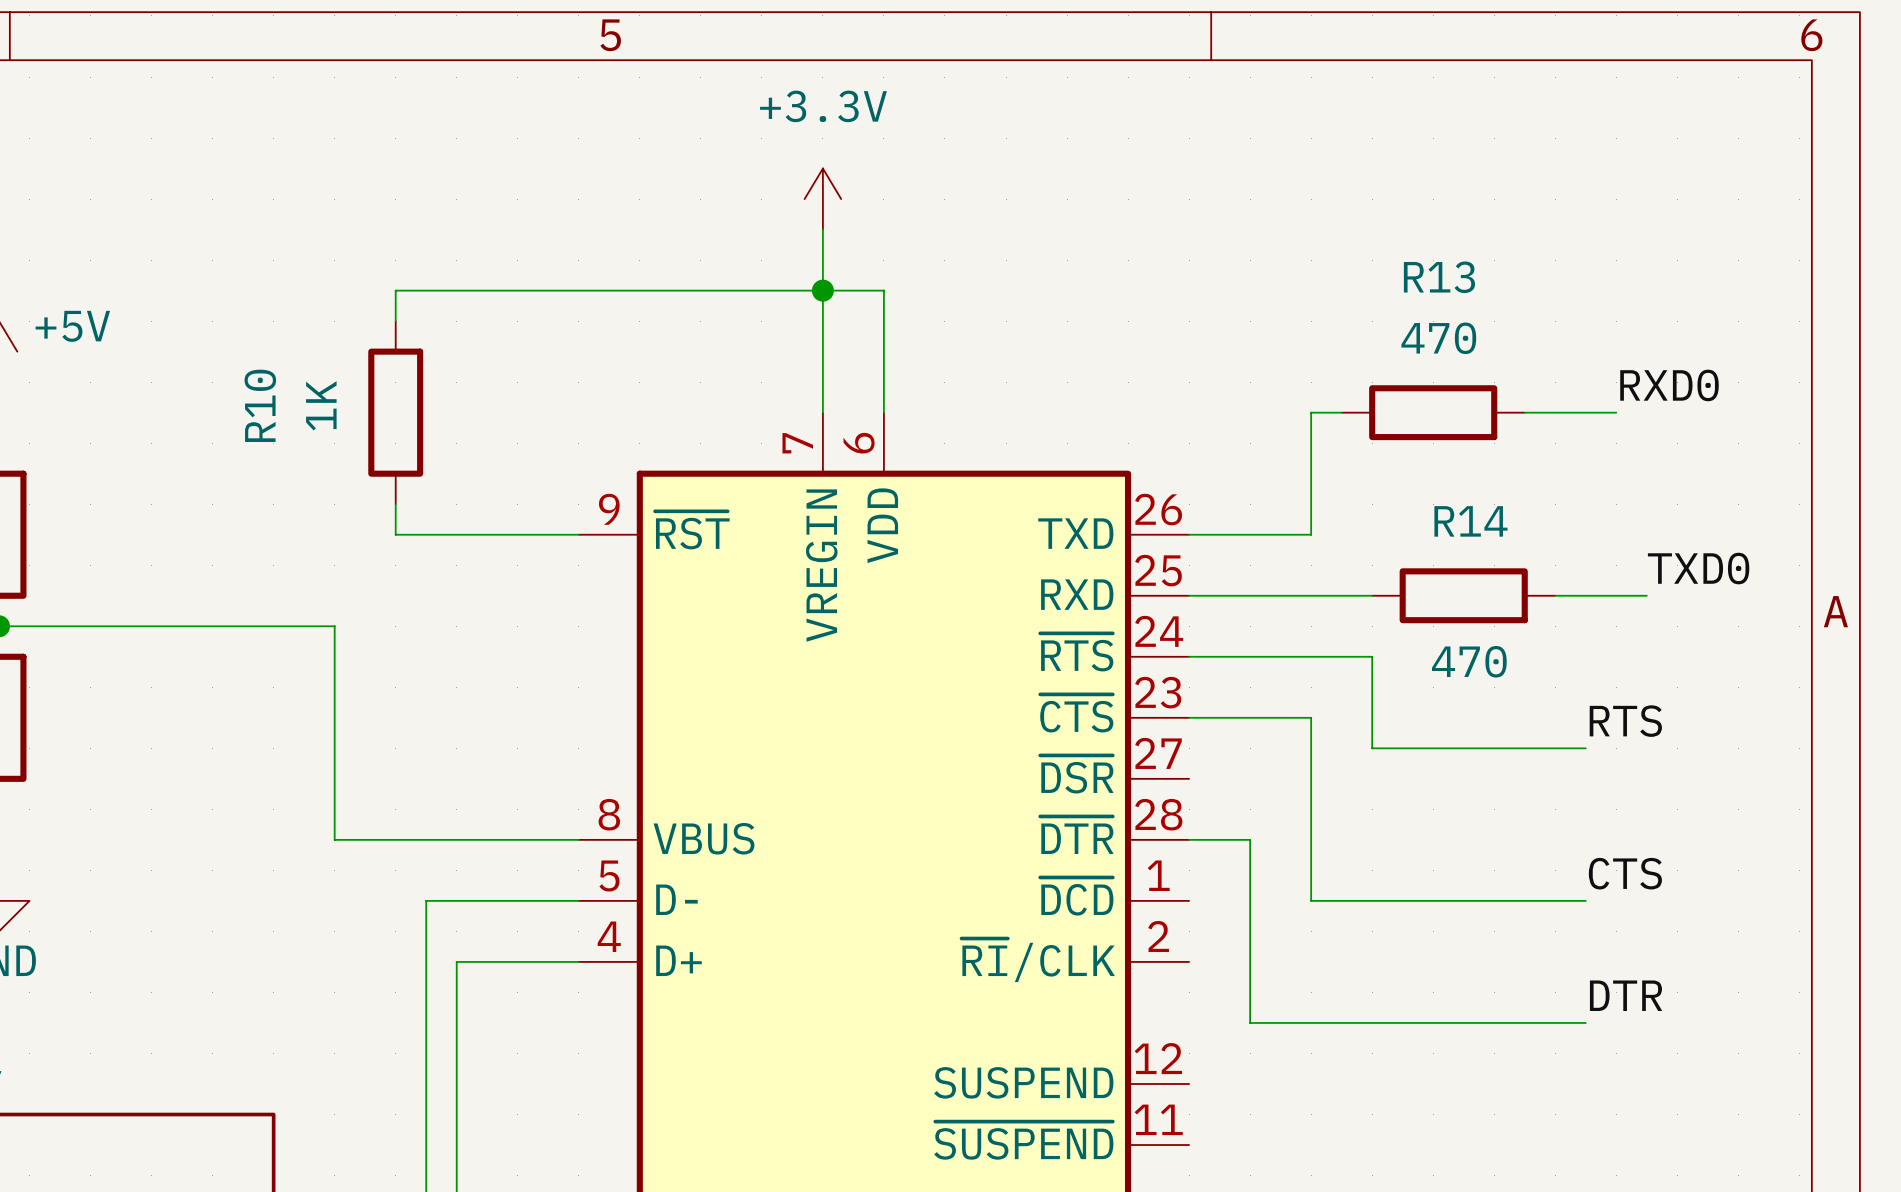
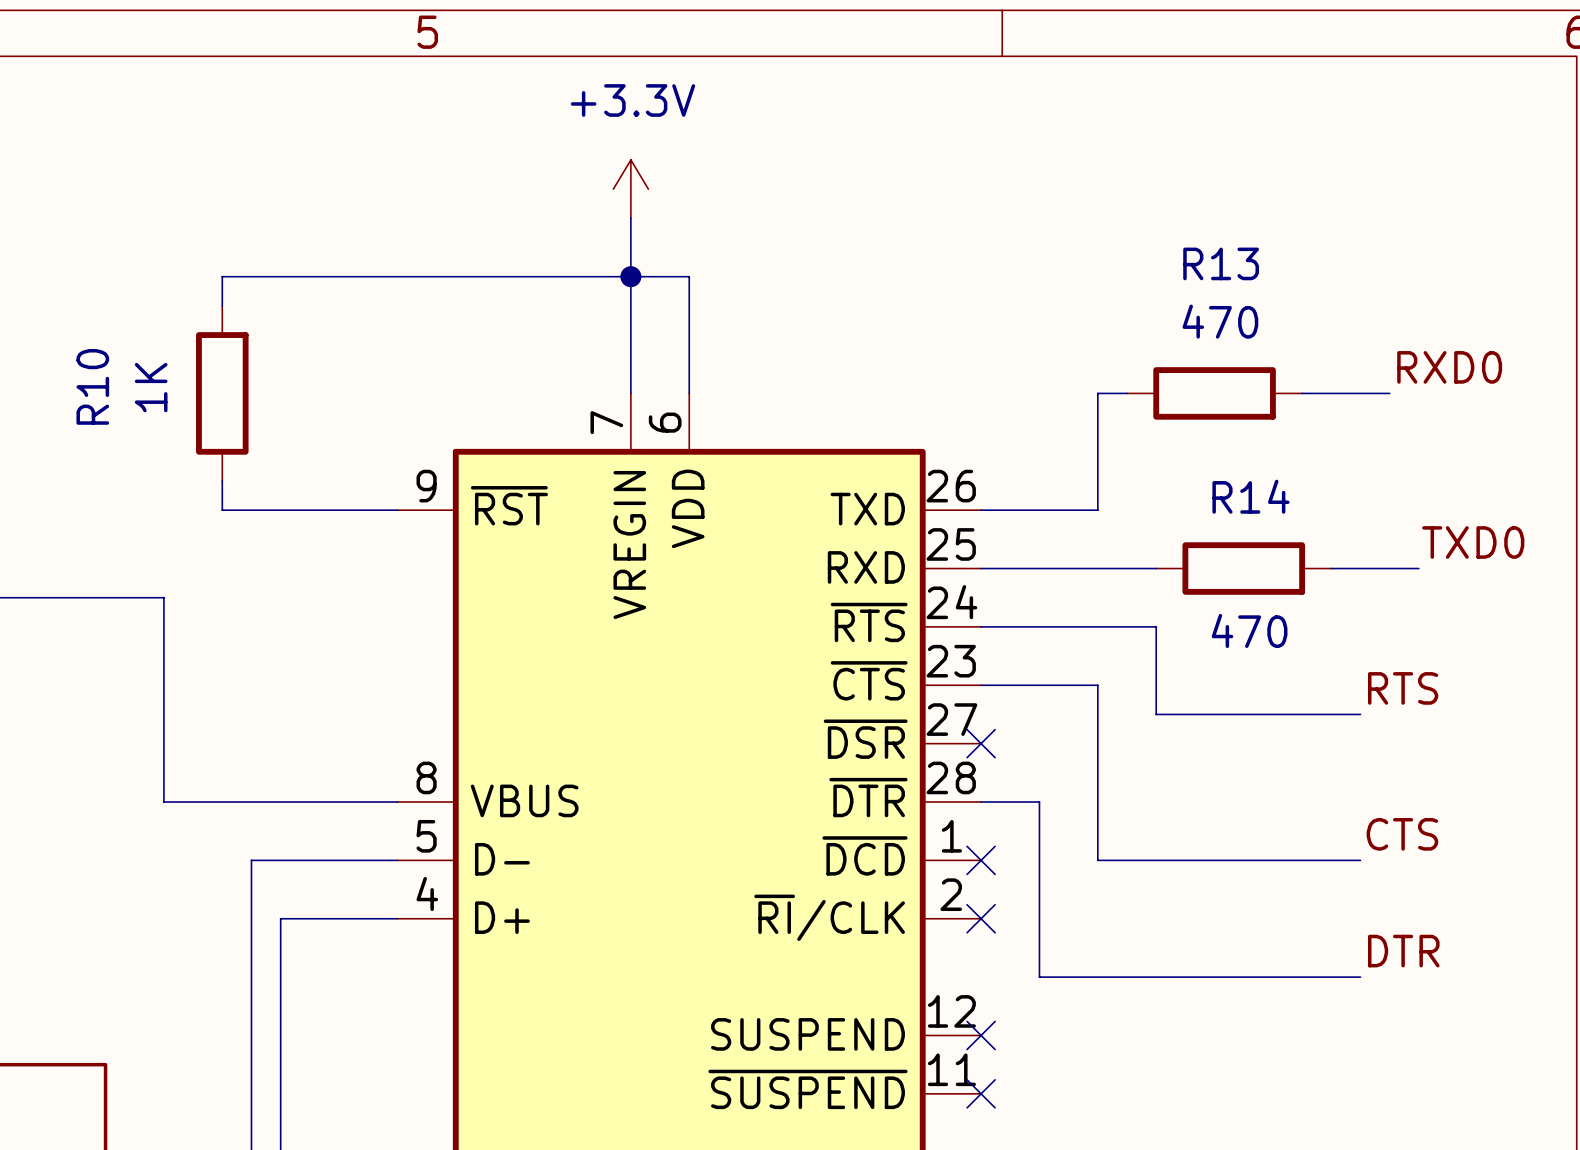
no-connect mark: none -> (981, 743)
no-connect mark: none -> (981, 860)
no-connect mark: none -> (981, 918)
no-connect mark: none -> (981, 1035)
no-connect mark: none -> (981, 1093)

